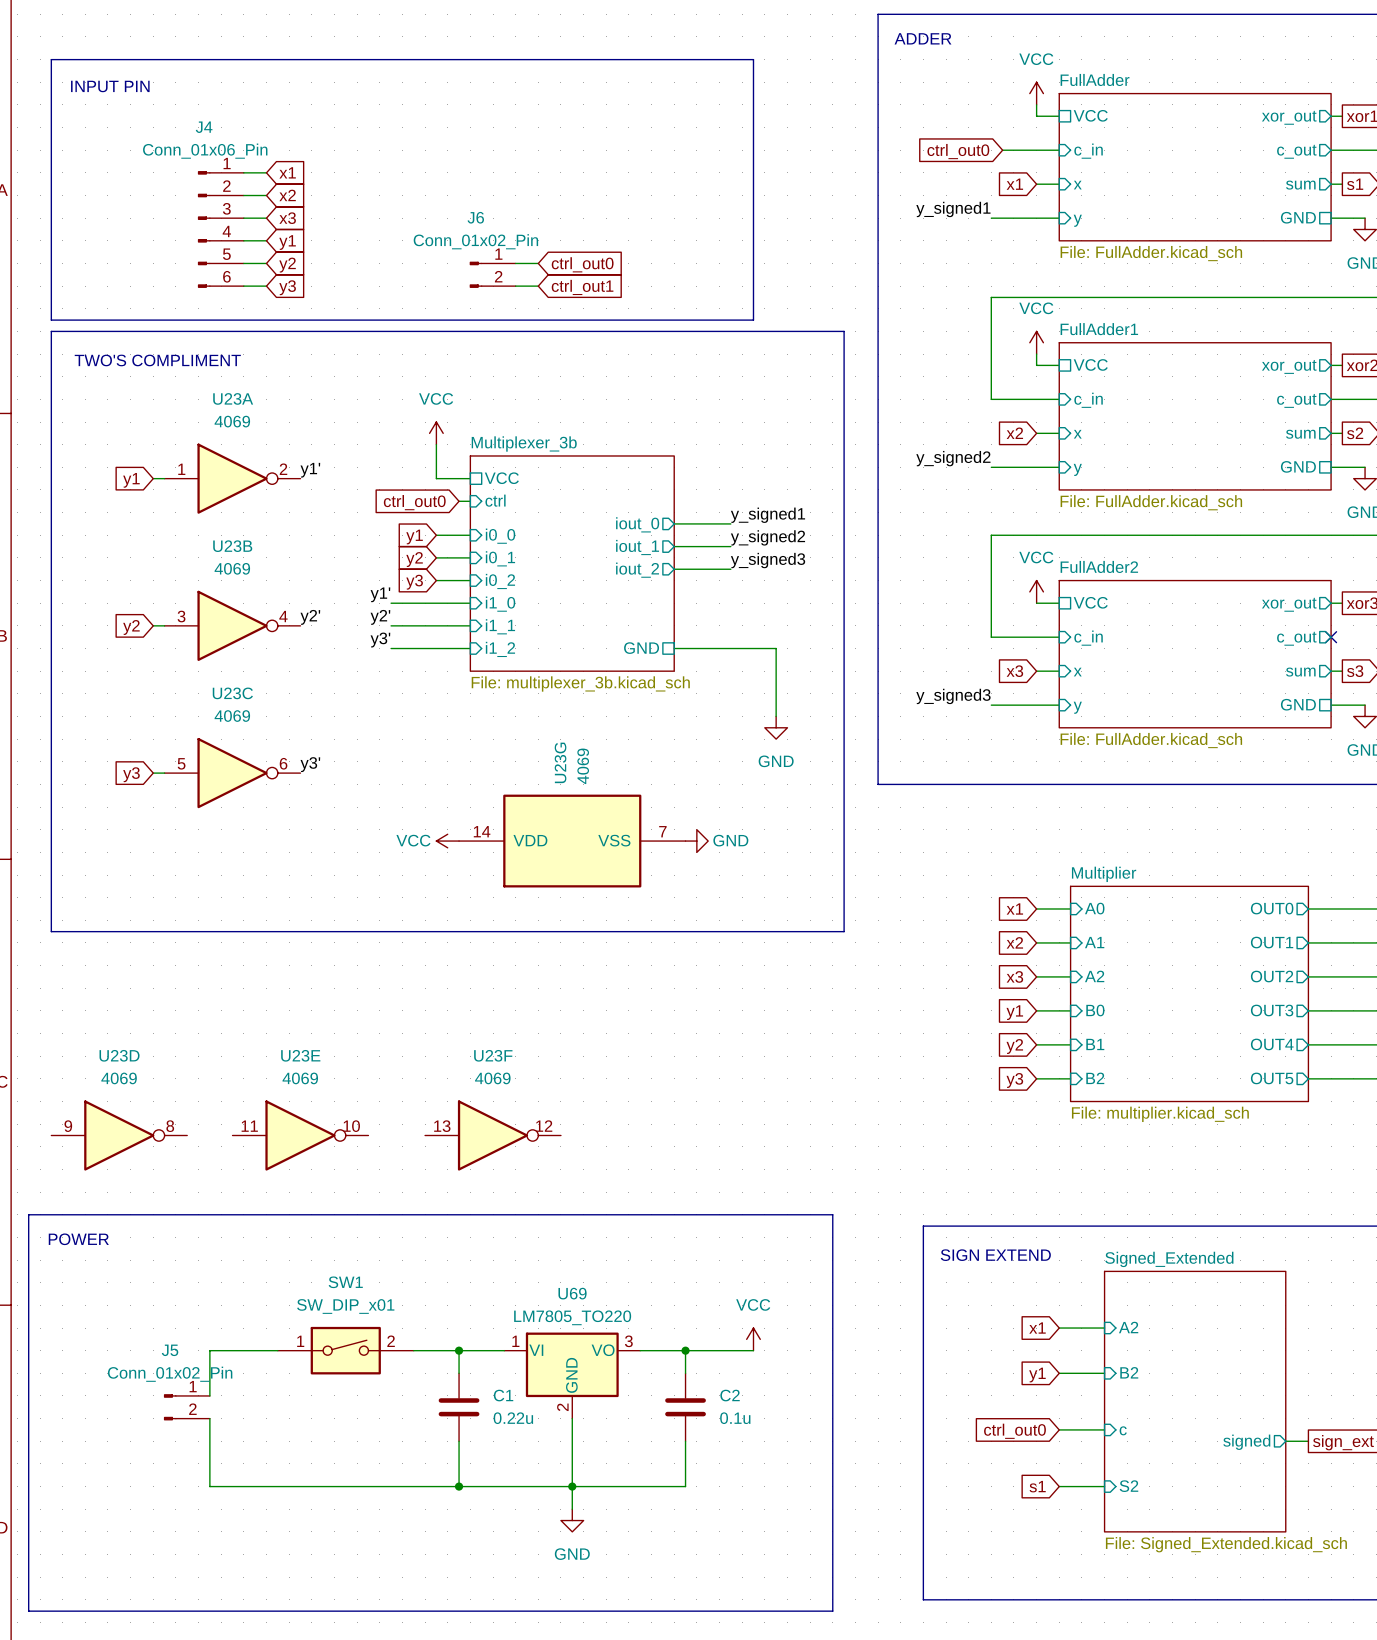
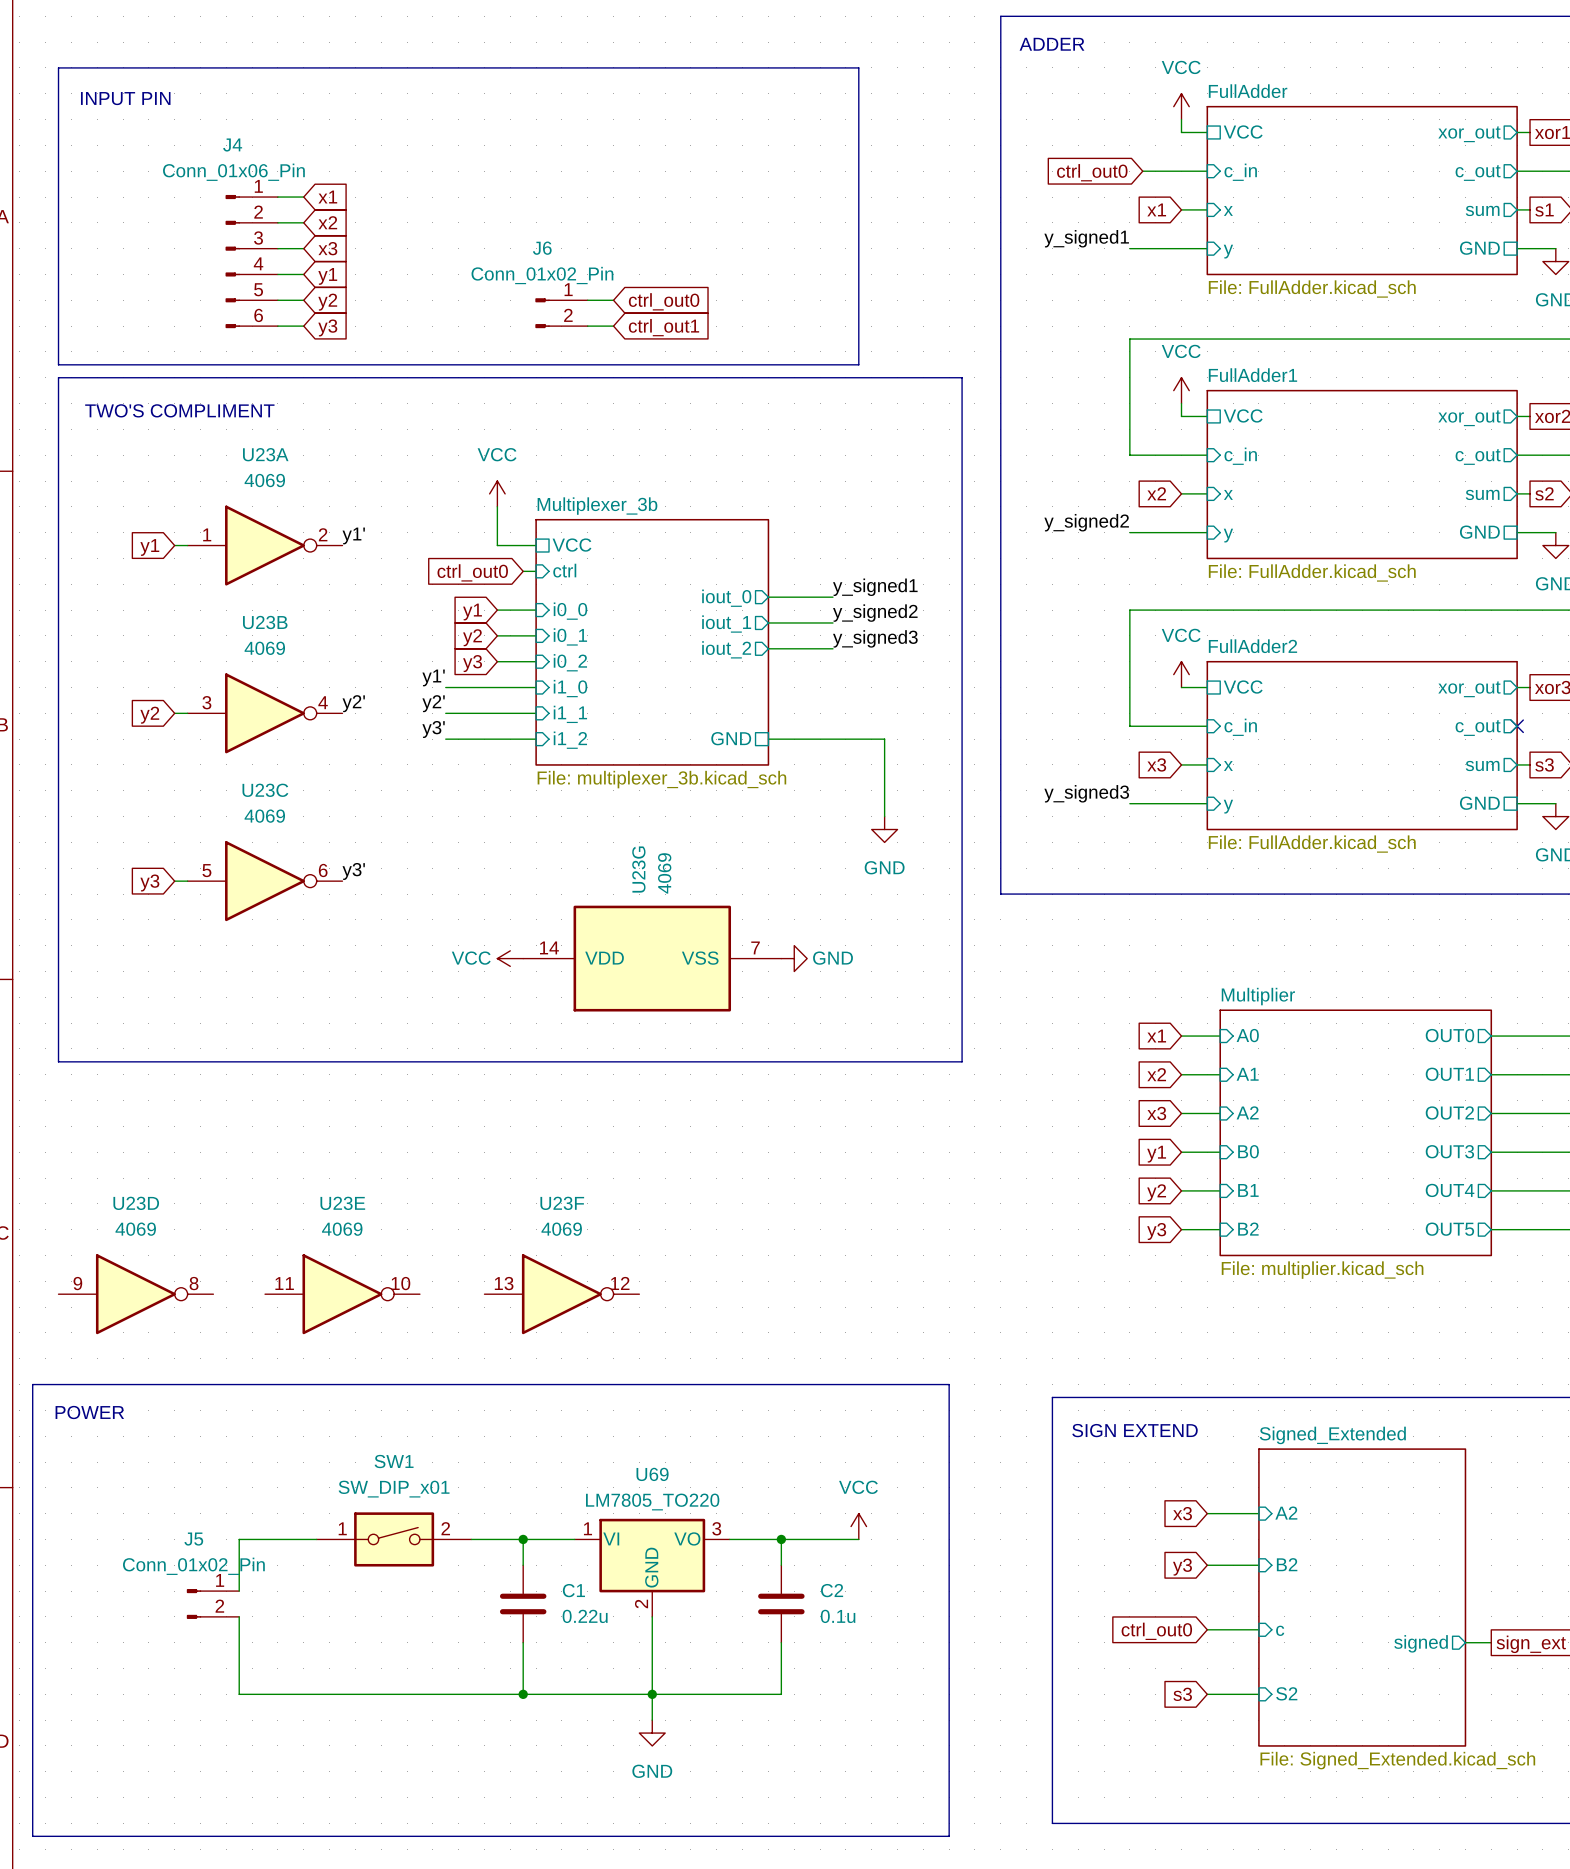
global label: x1 (1037, 1328) -> x3 (1182, 1513)
global label: y1 (1037, 1375) -> y3 (1182, 1567)
global label: s1 (1037, 1486) -> s3 (1182, 1694)

